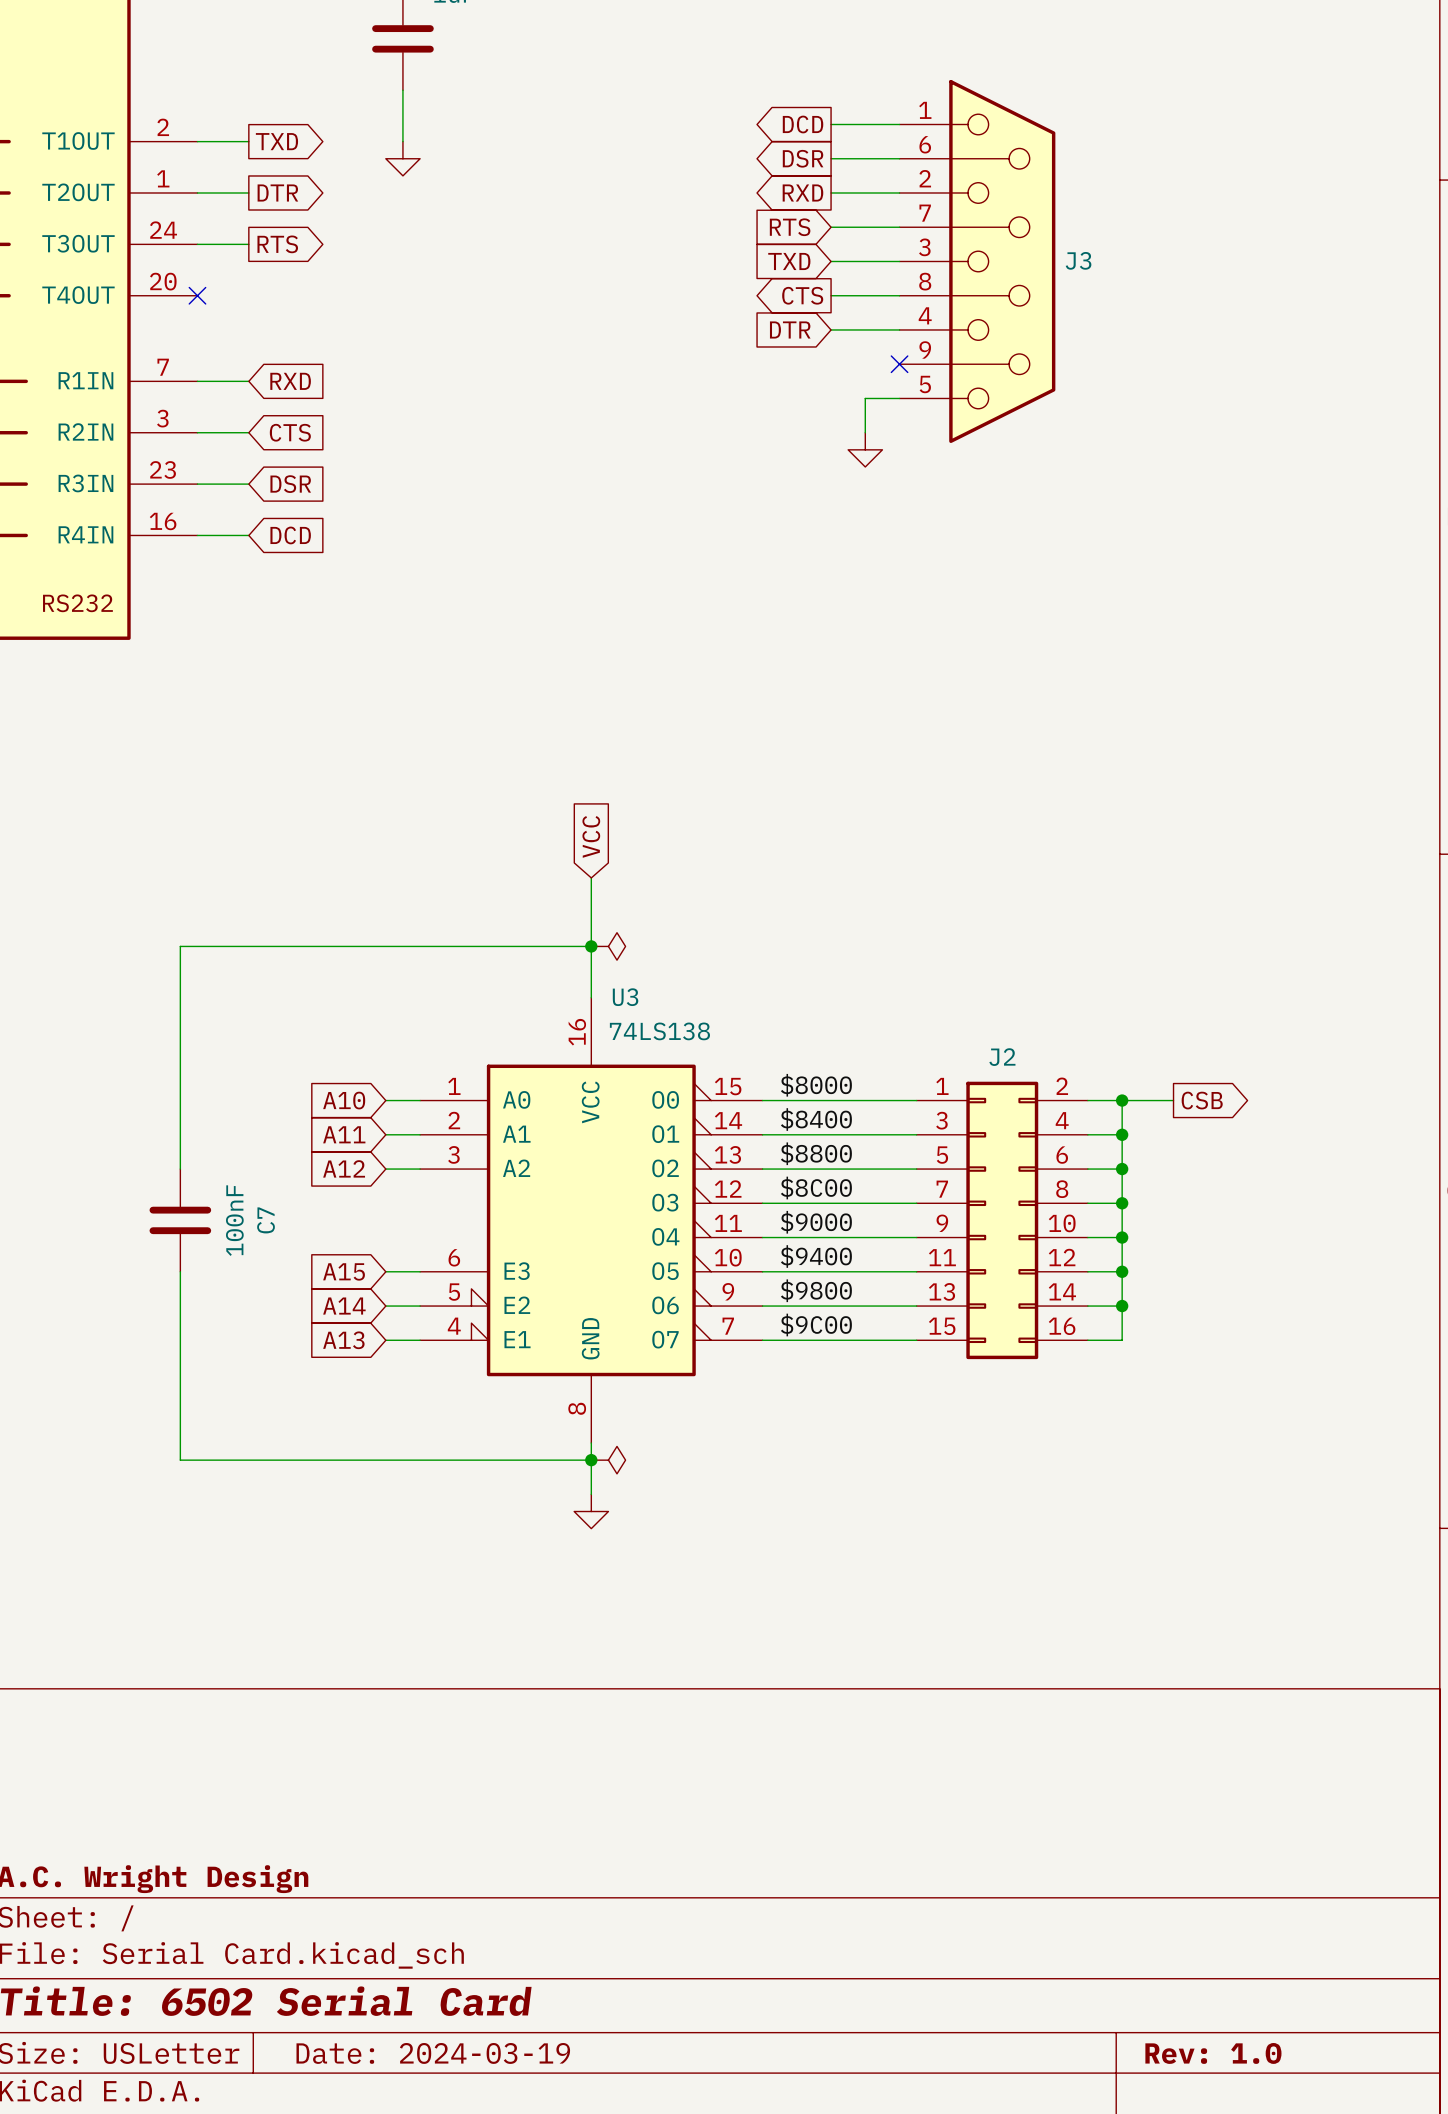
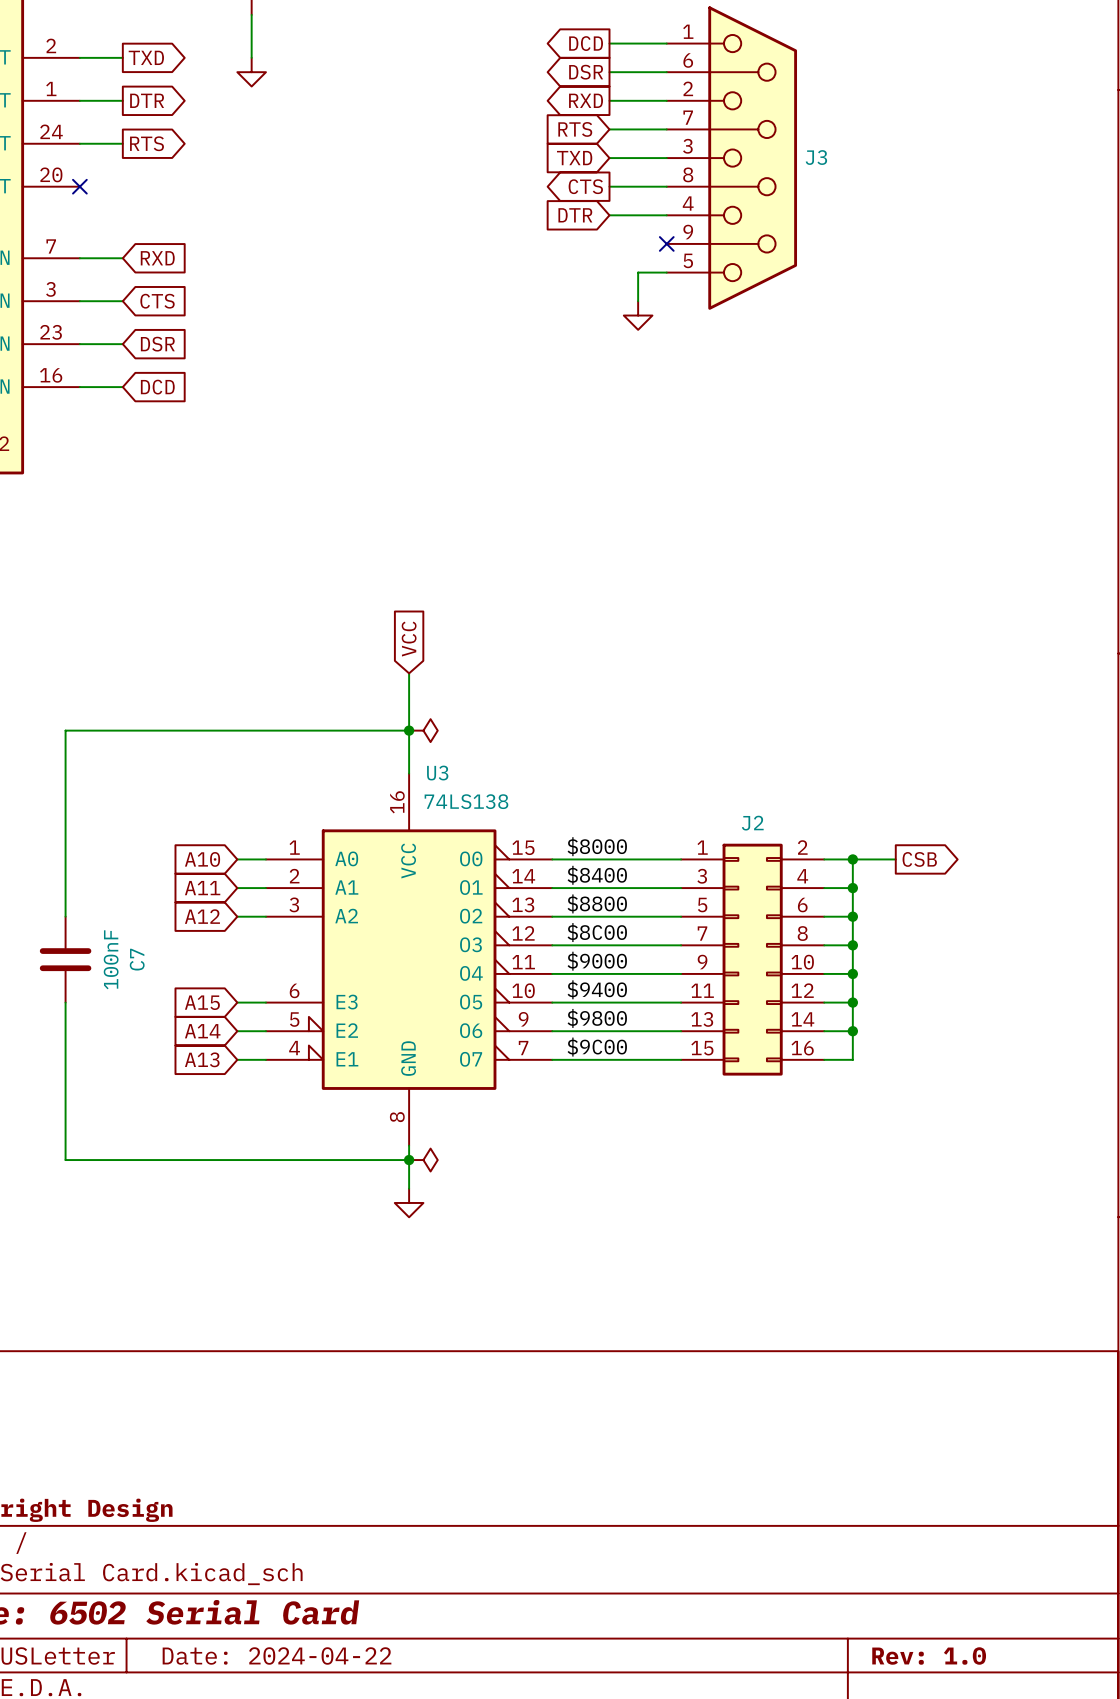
title block: Date: 2024-03-19 (433, 2053) -> Date: 2024-04-22 (277, 1655)

